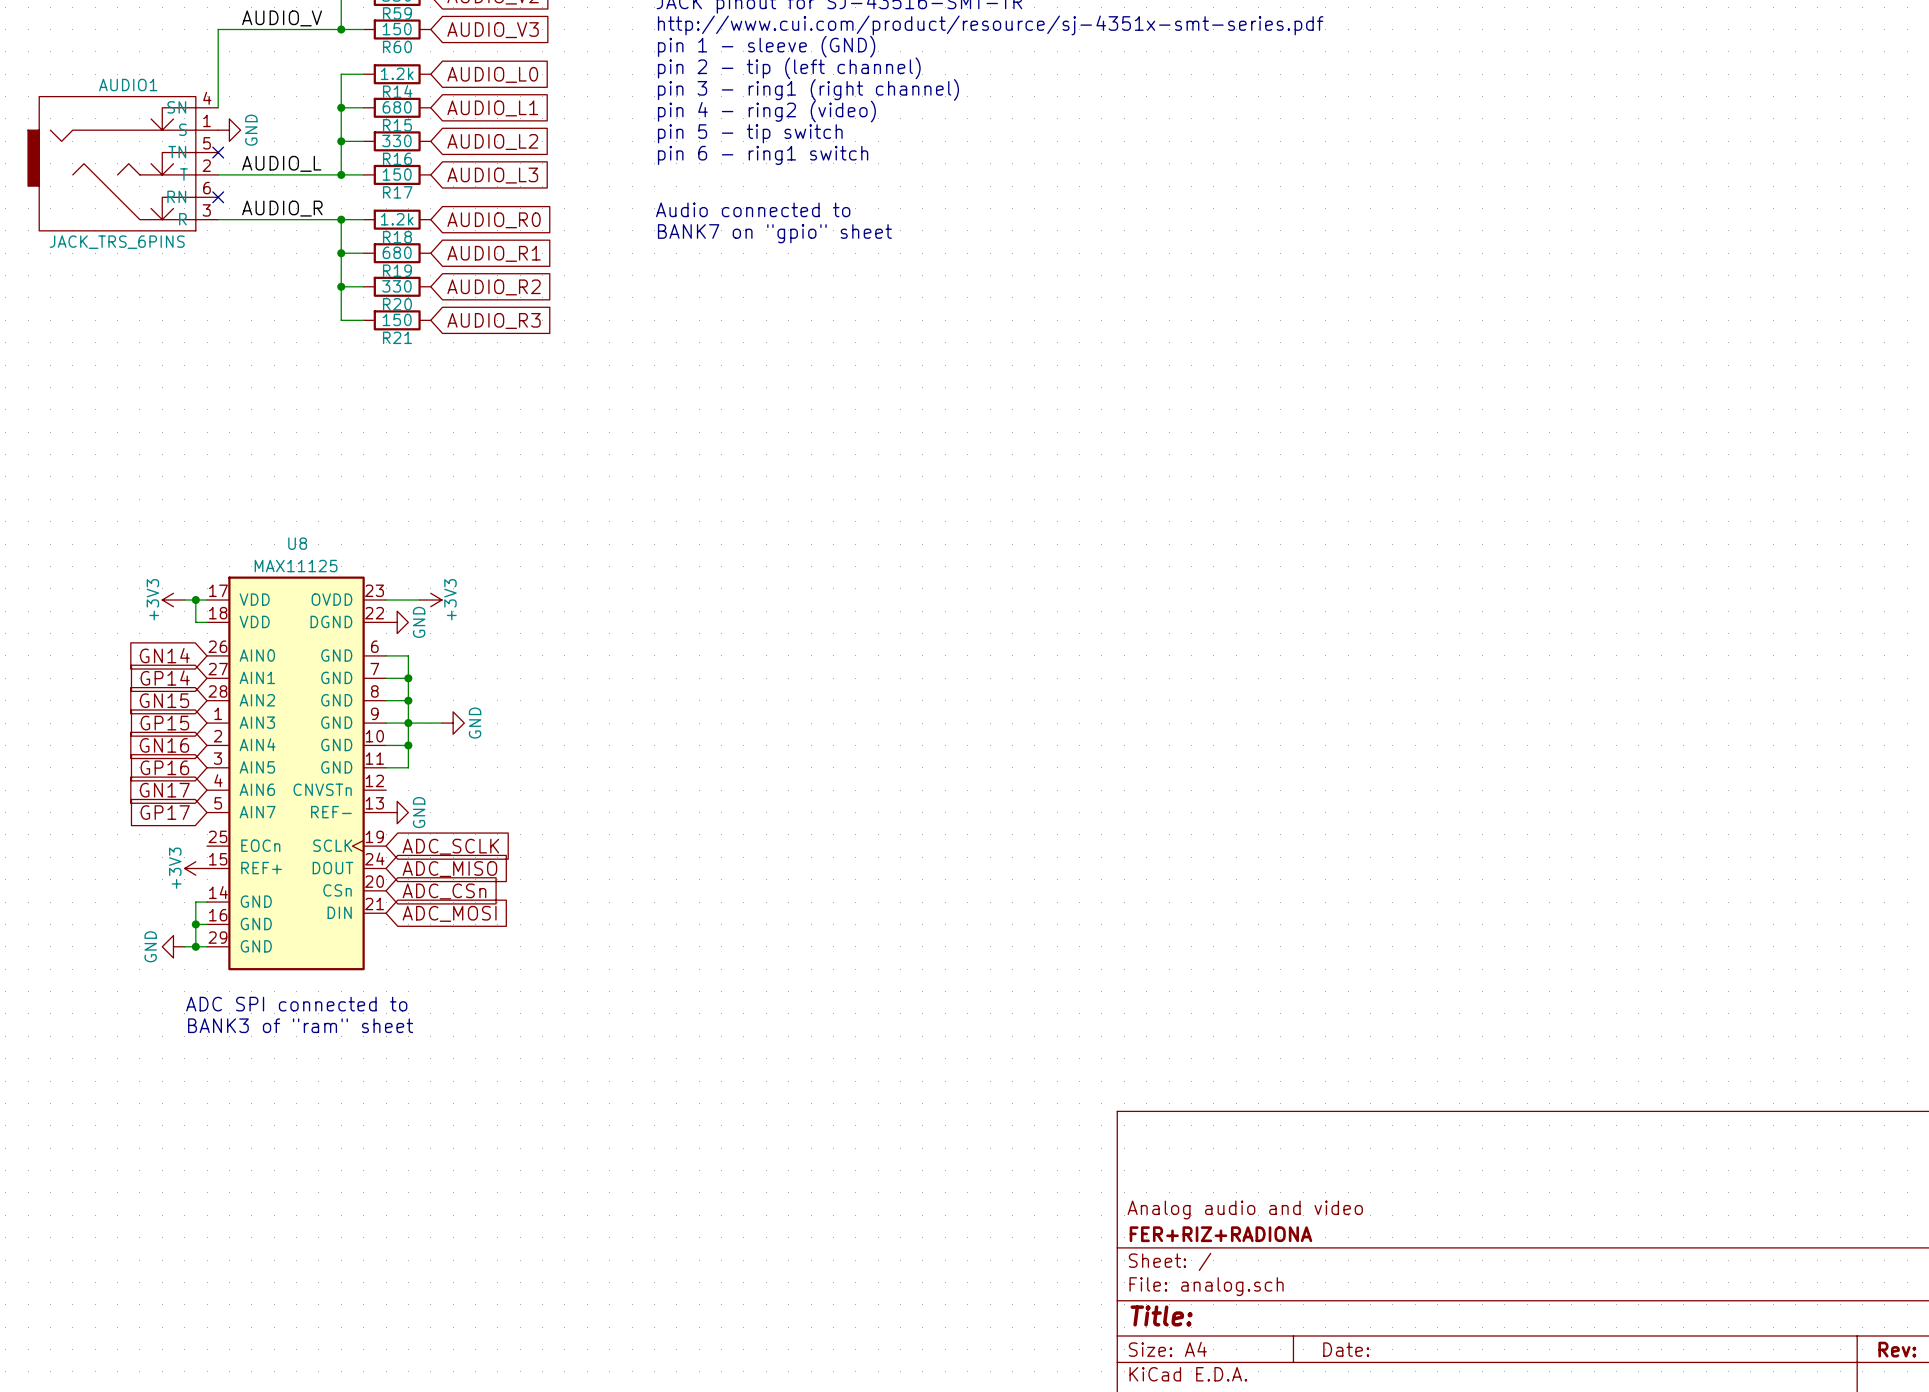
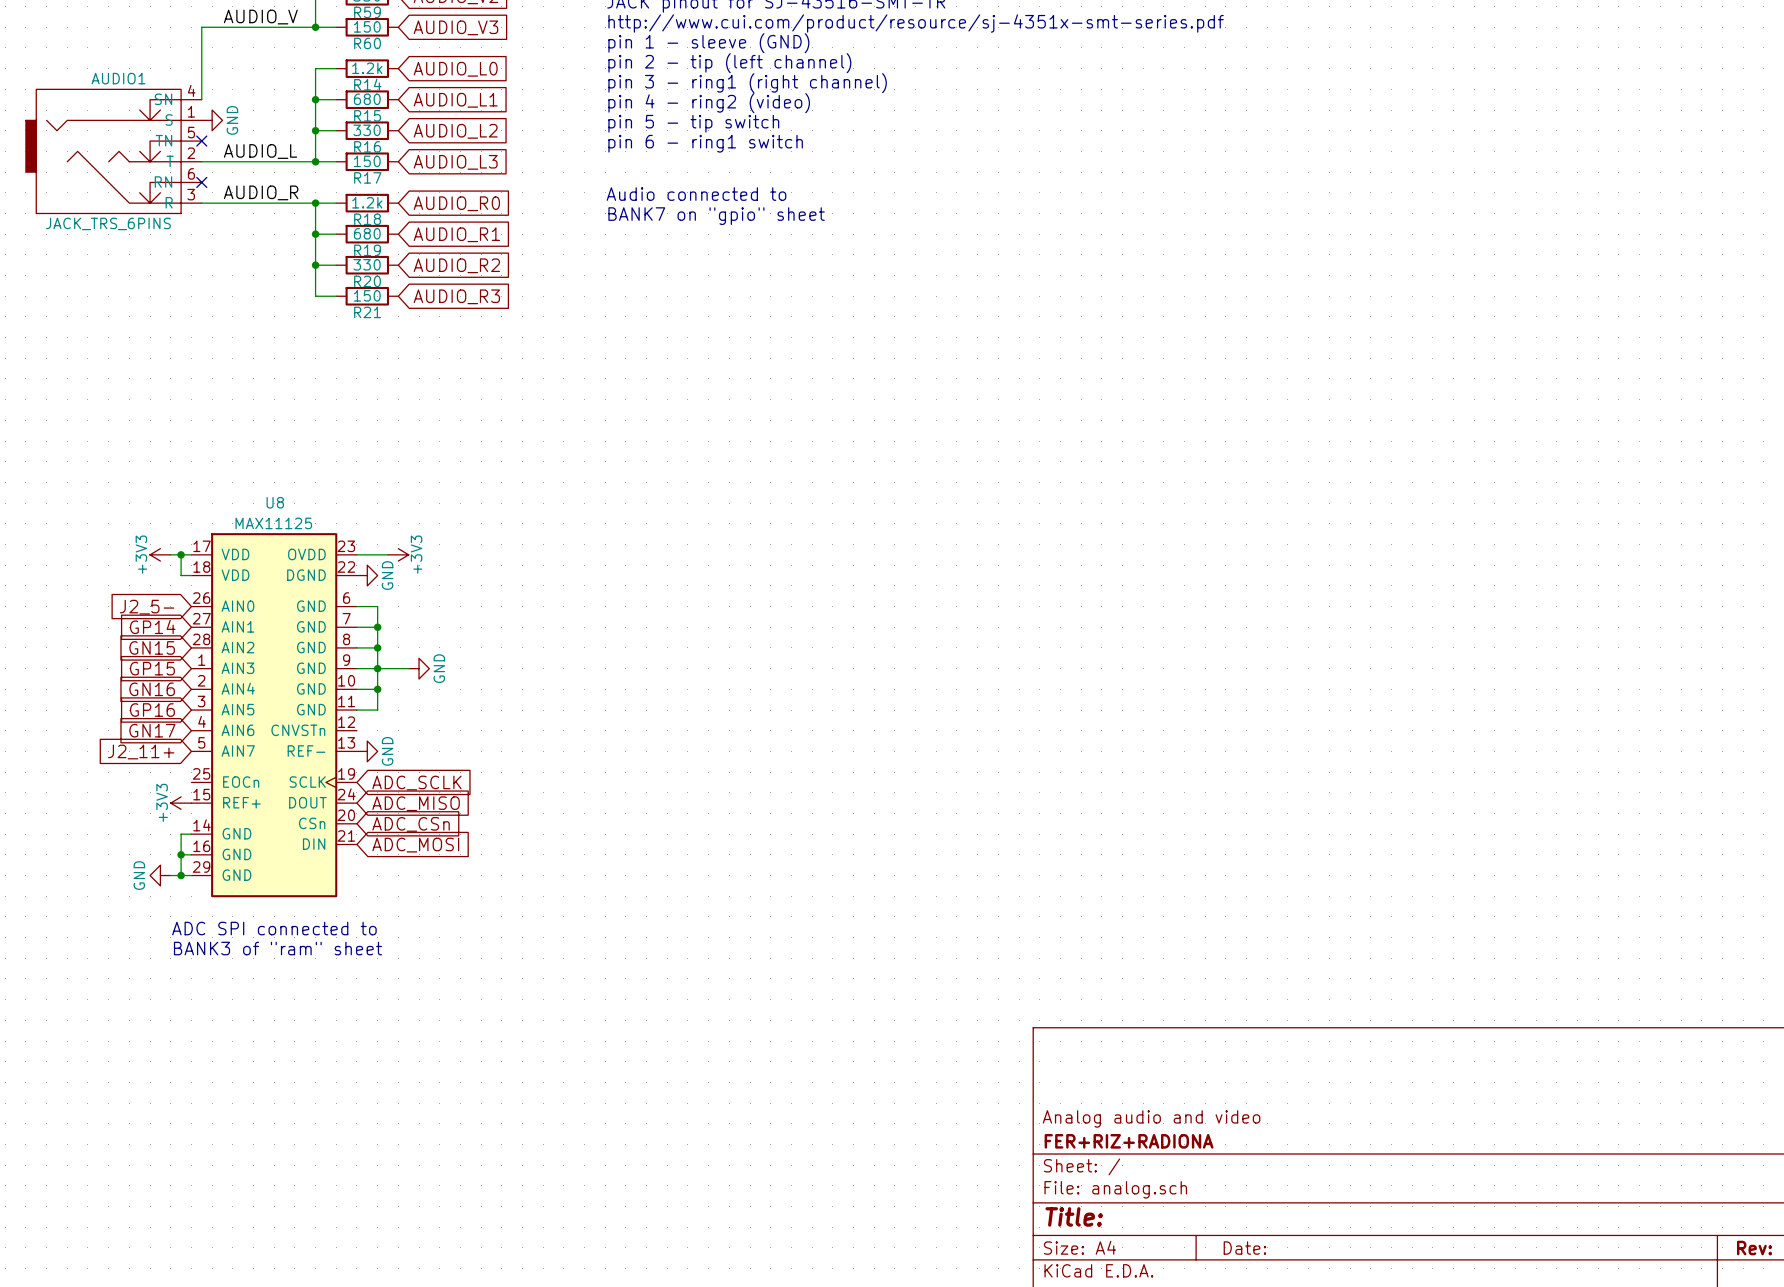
global label: GN14 (164, 655) -> J2_5- (147, 607)
global label: GP17 (165, 812) -> J2_11+ (141, 751)

